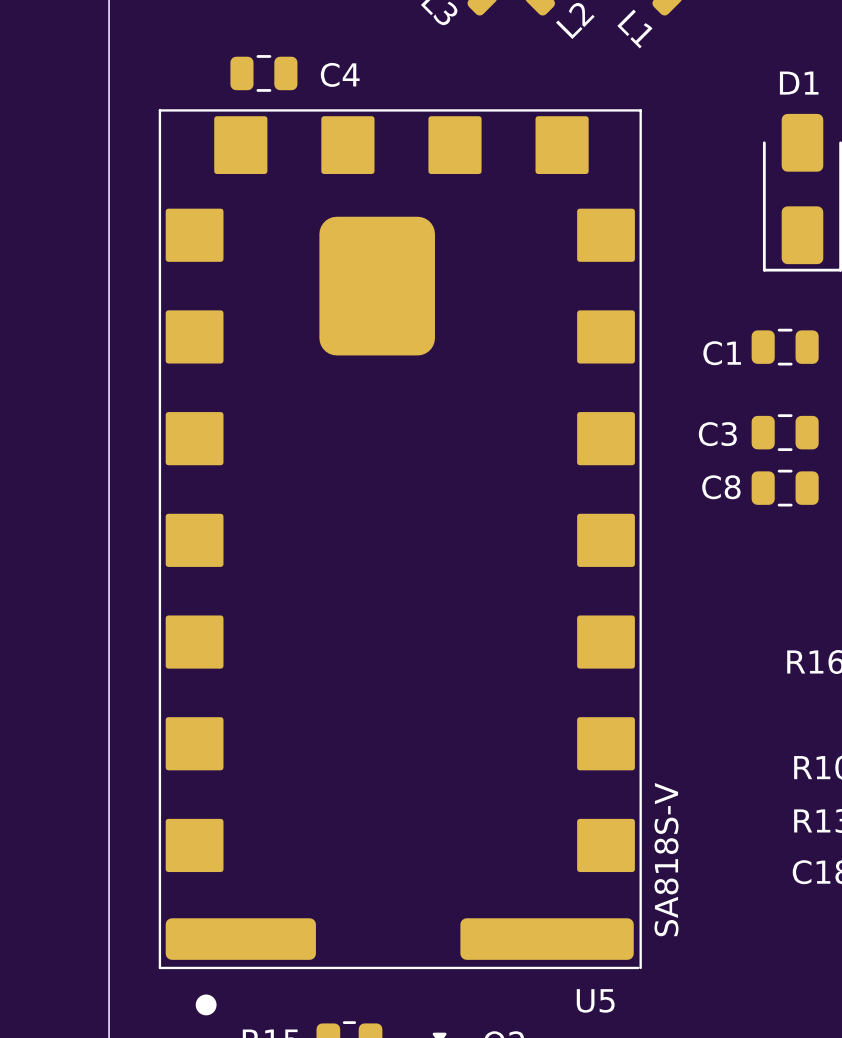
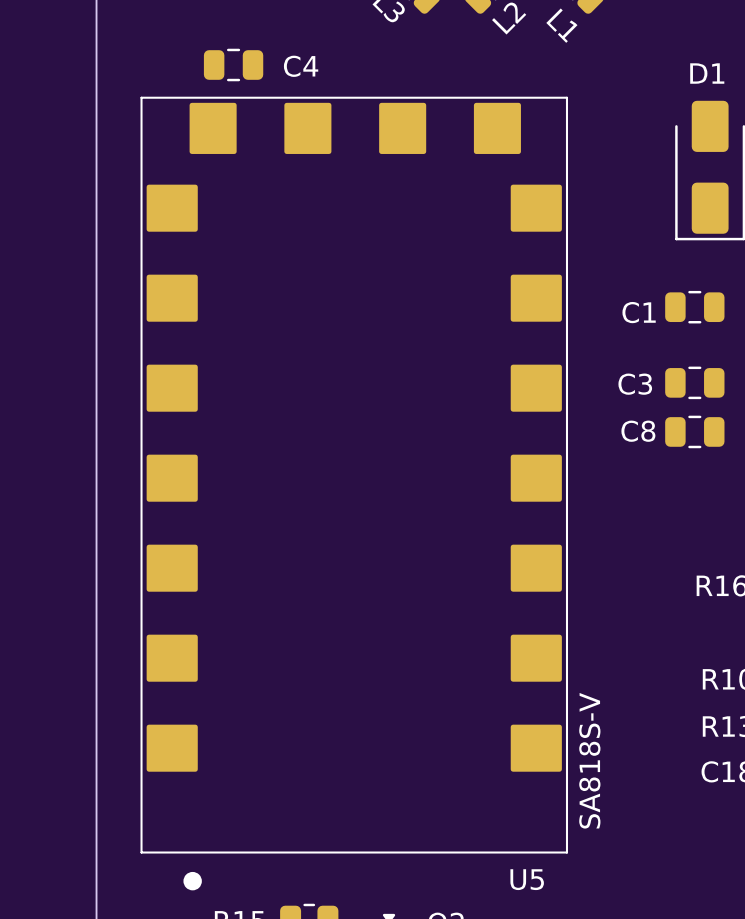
U5 footprint: [158, 109, 642, 1016] -> [140, 96, 569, 891]

